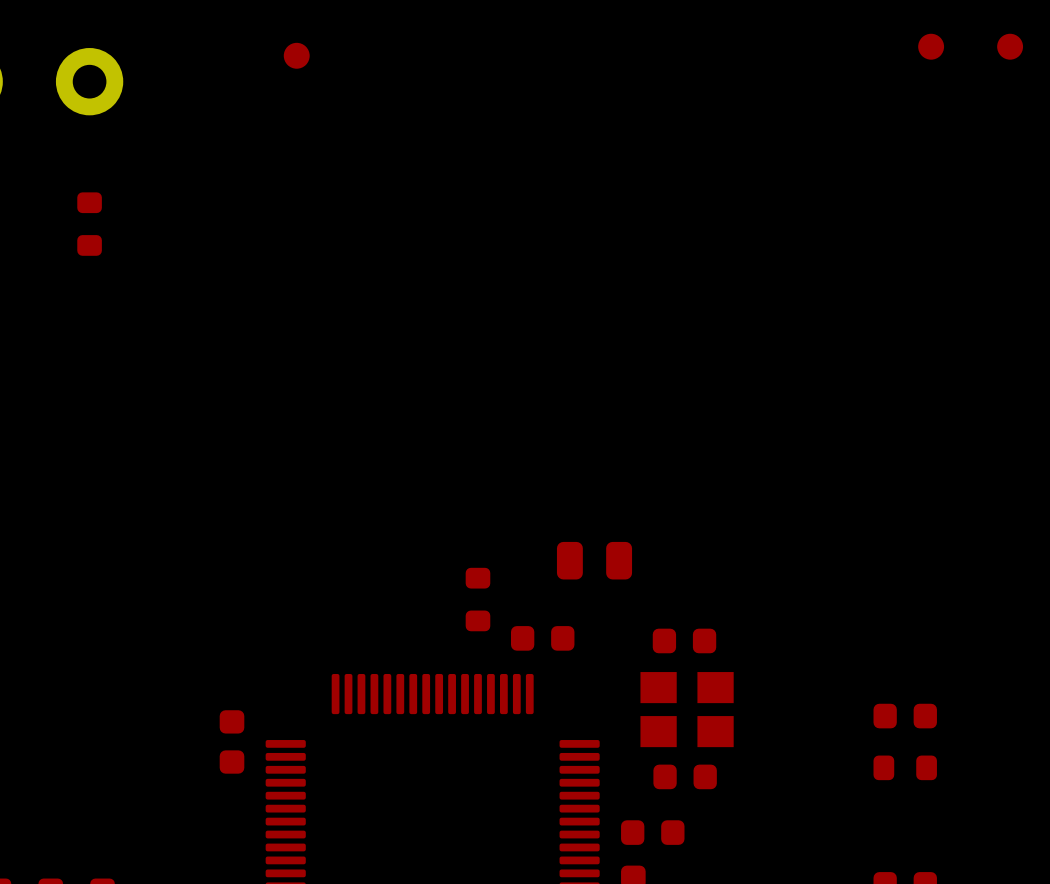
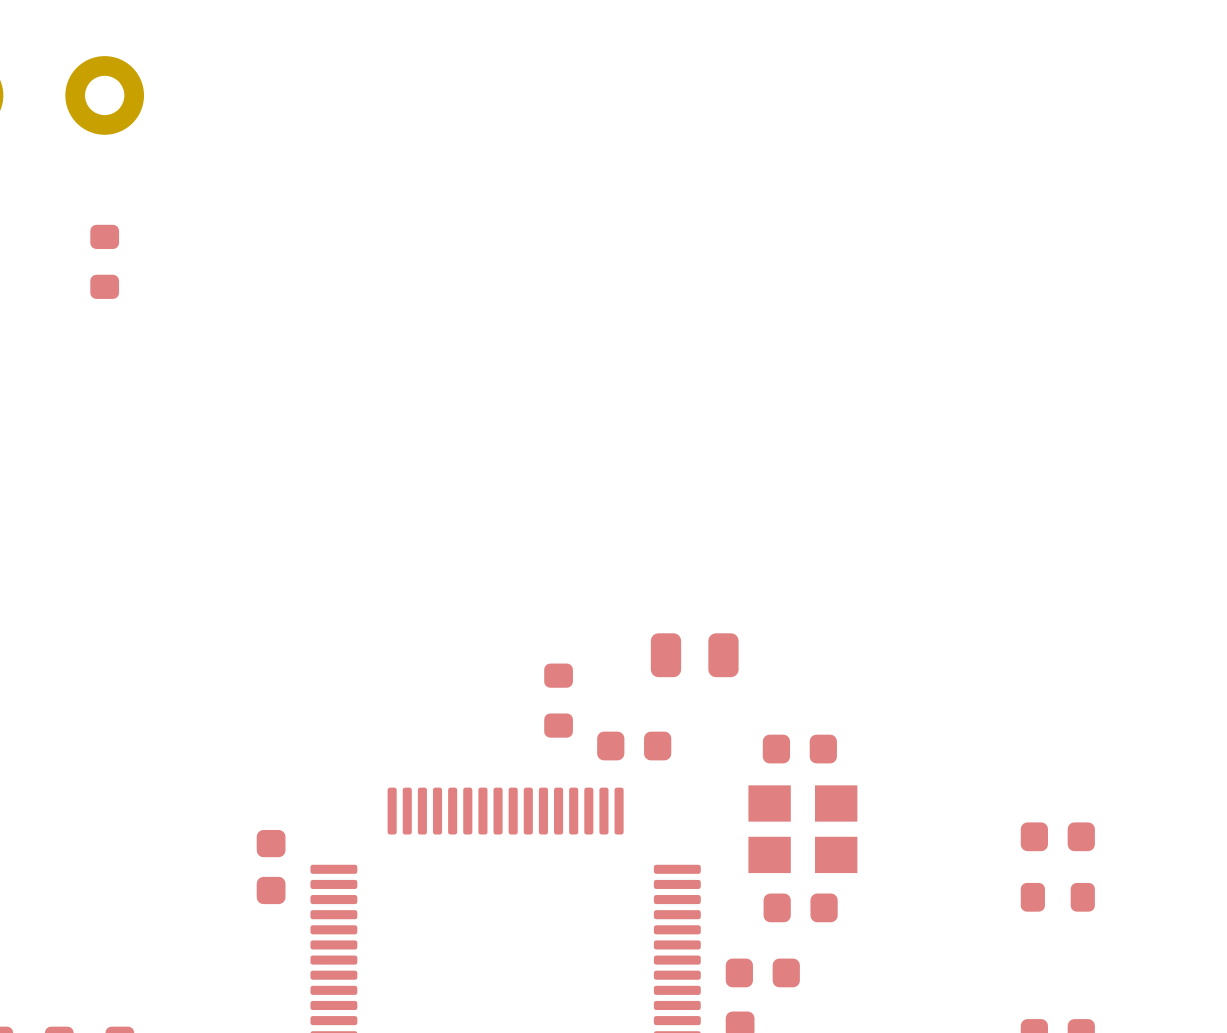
part: (931, 46) -> none
part: (1010, 46) -> none
part: (296, 55) -> none

